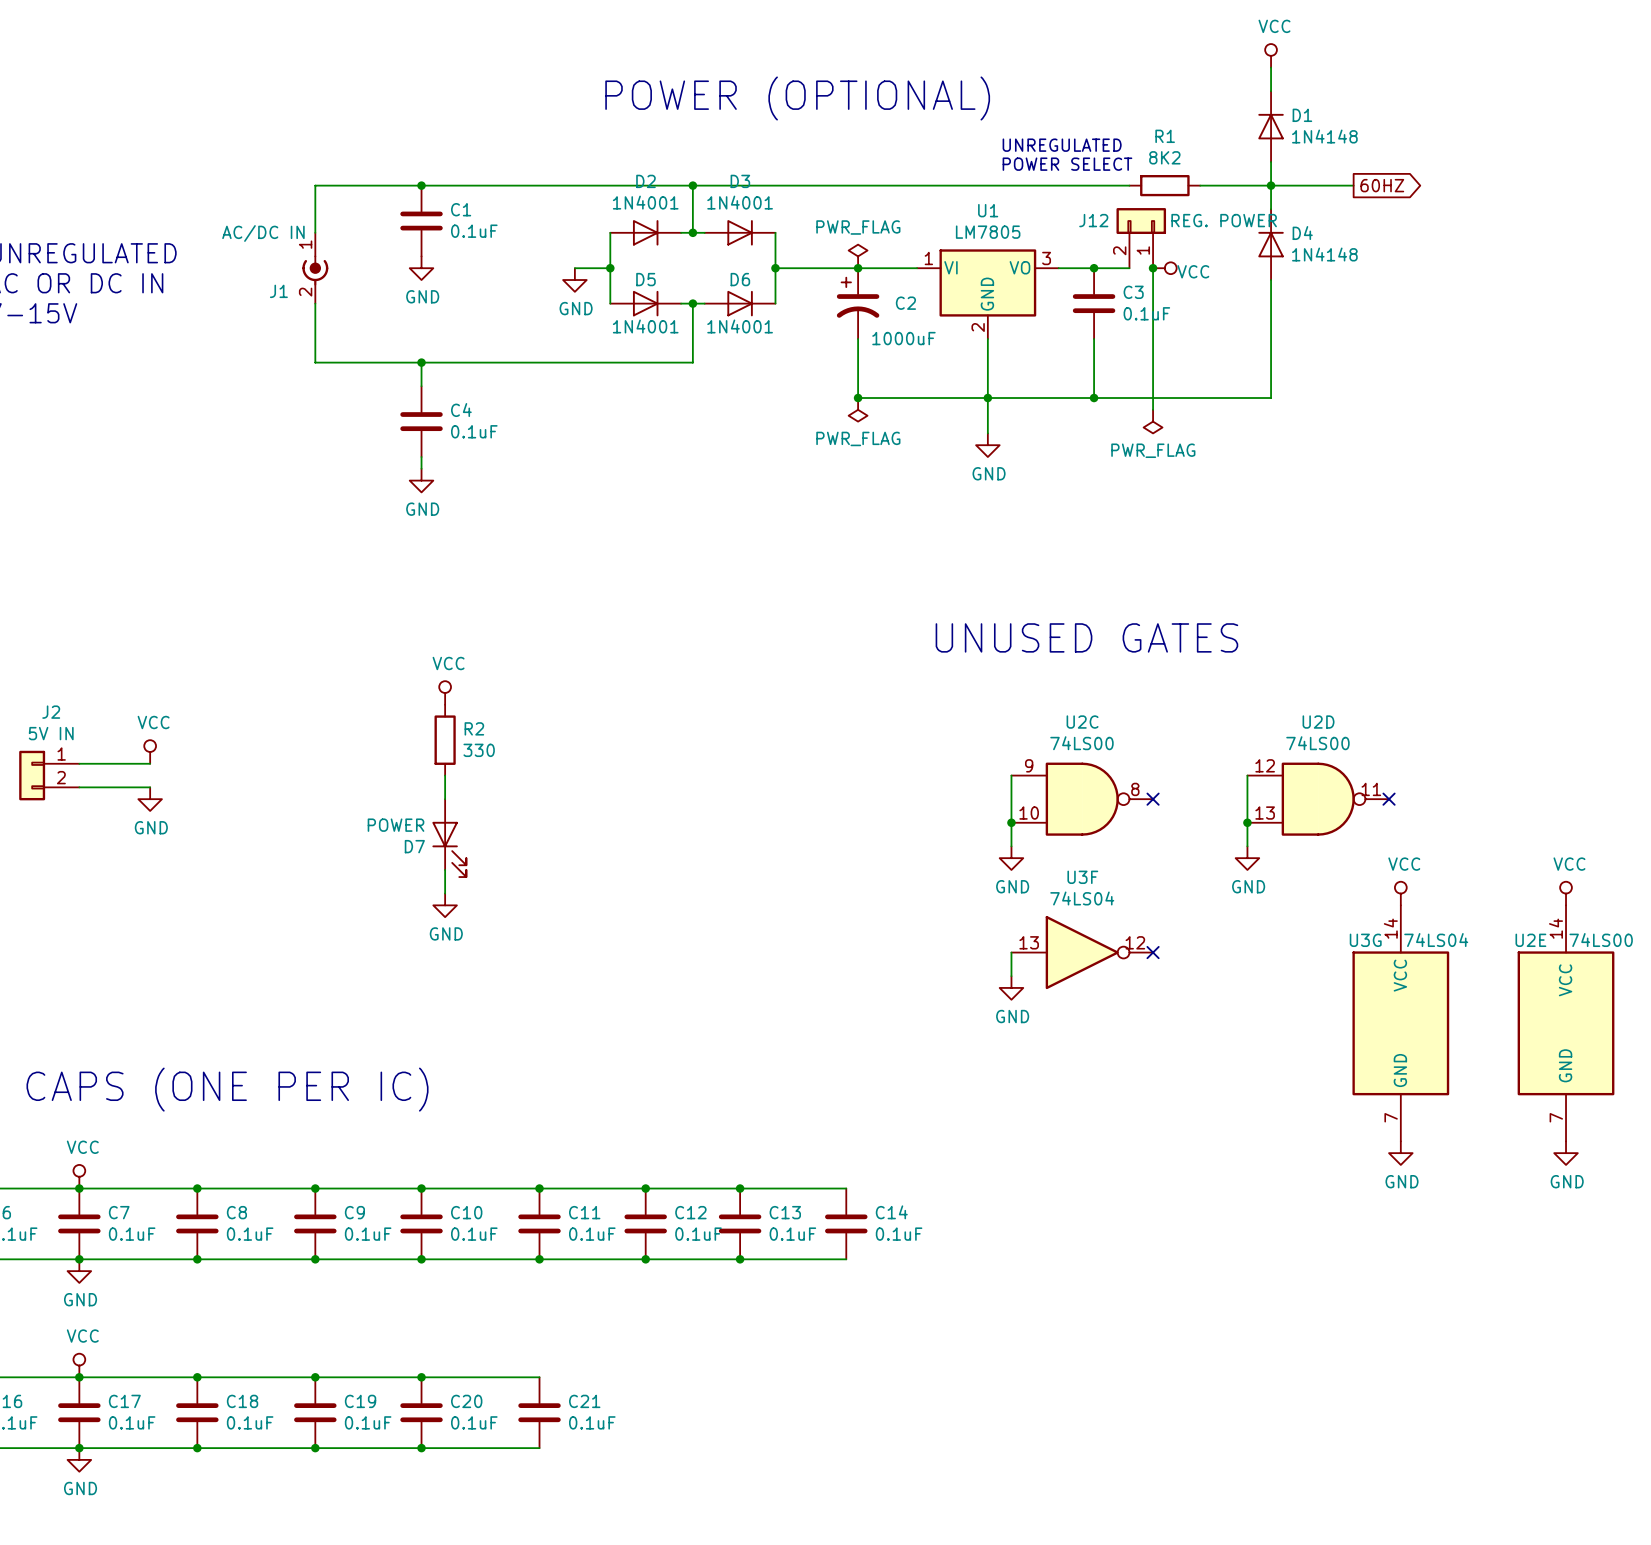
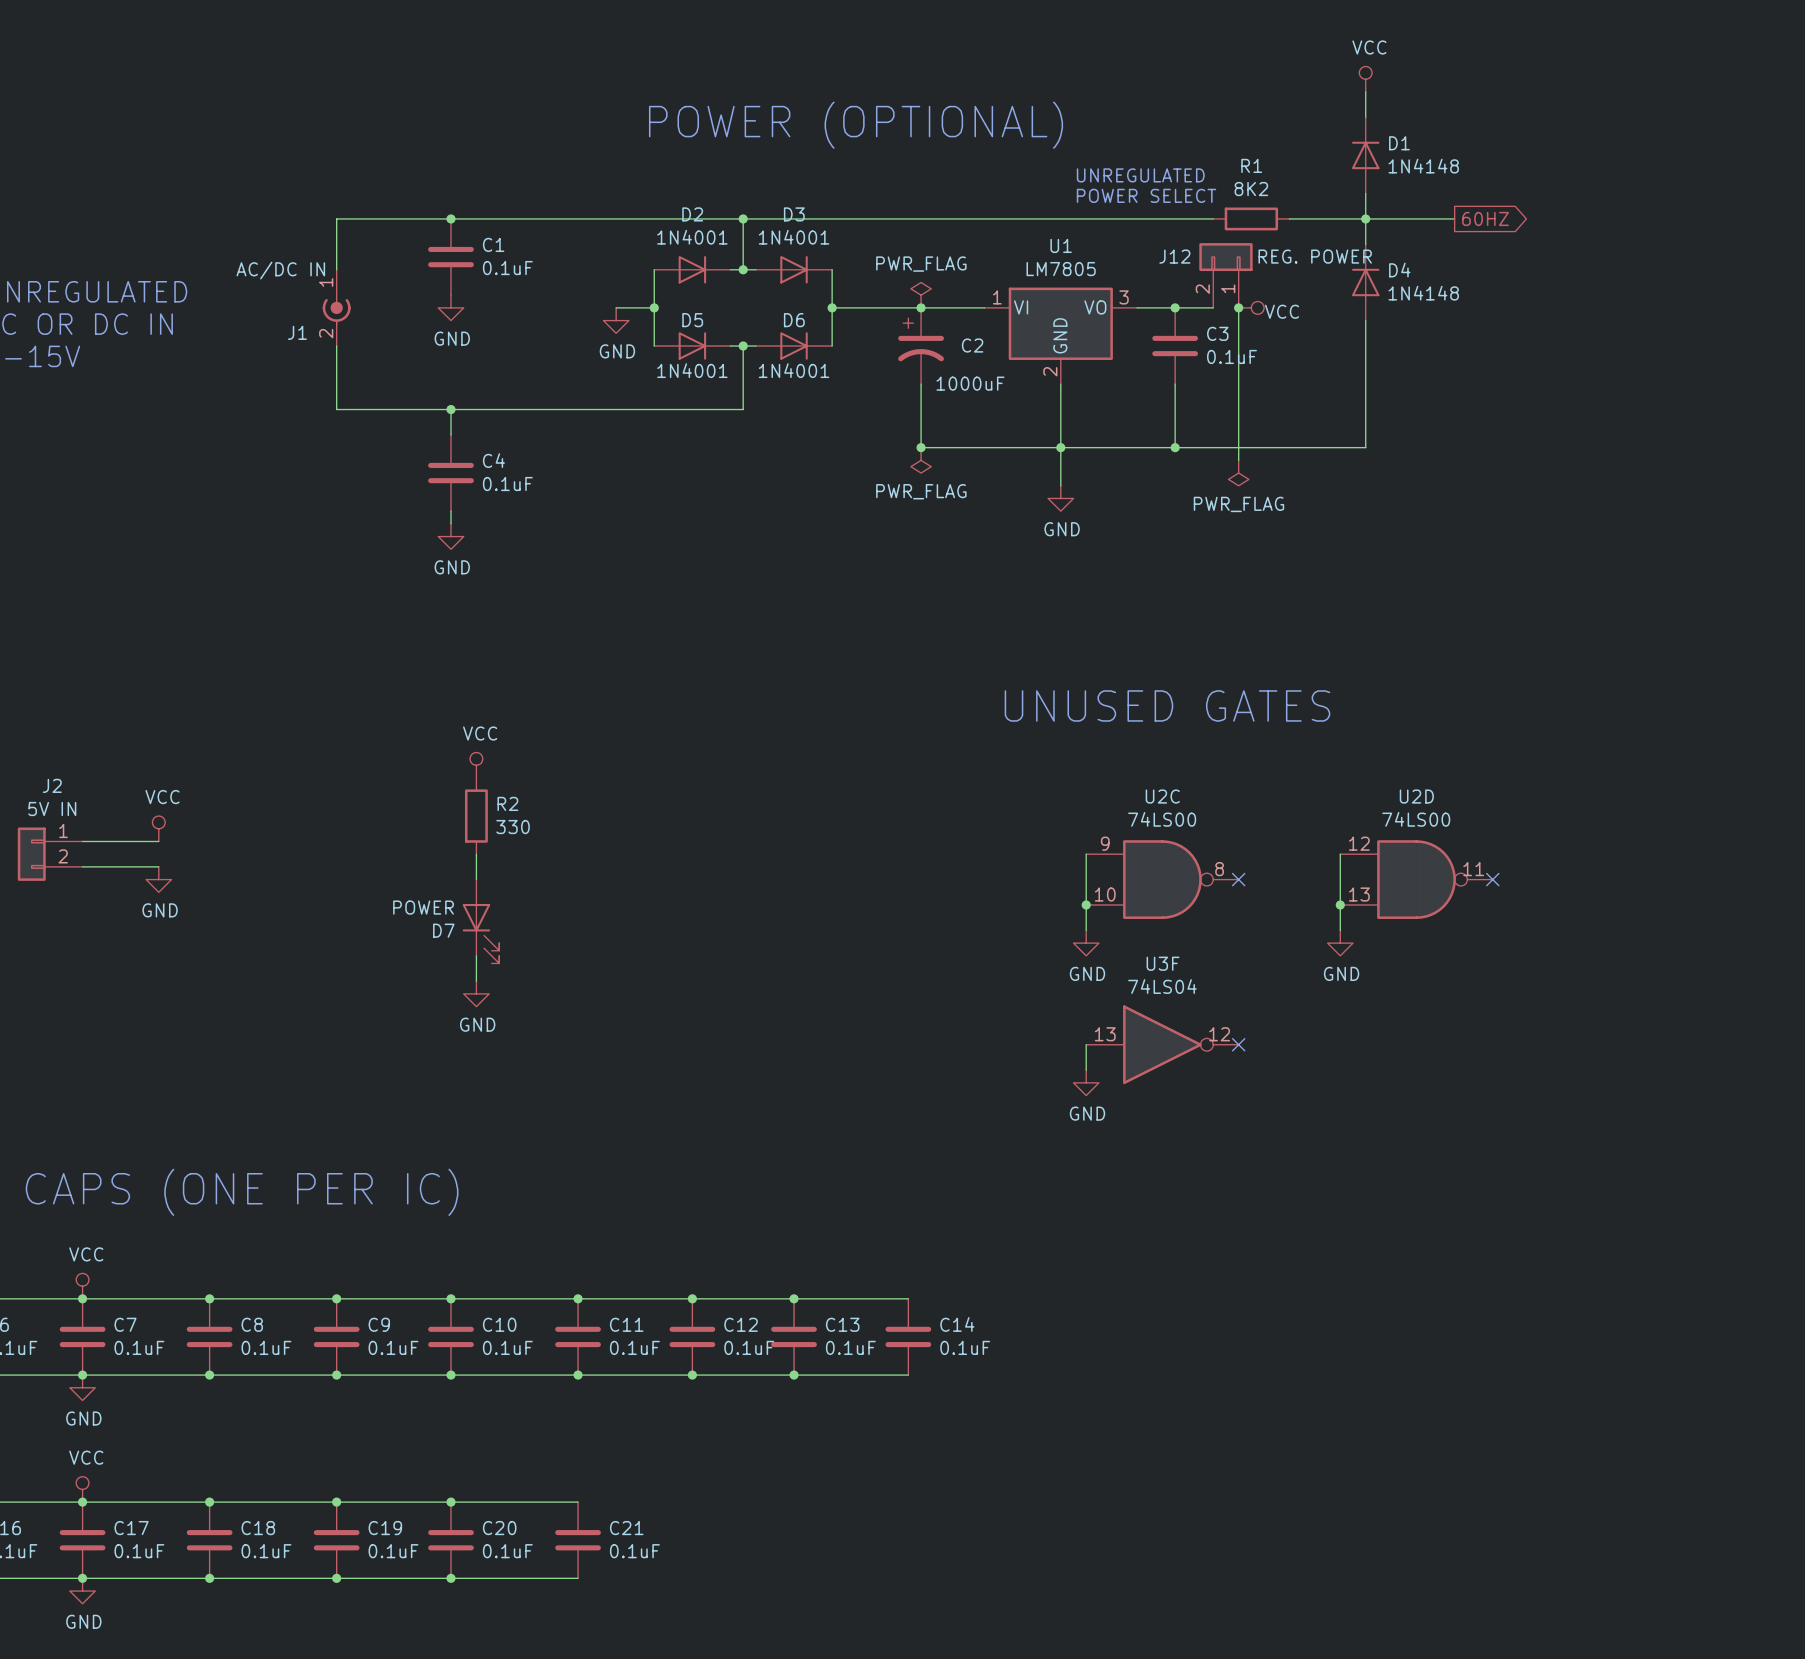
power symbol: VCC (1400, 893) -> none
power symbol: VCC (1566, 893) -> none
U3G: 74LS04 (1400, 1023) -> none
U2E: 74LS00 (1566, 1023) -> none
power symbol: GND (1400, 1153) -> none
power symbol: GND (1566, 1153) -> none

